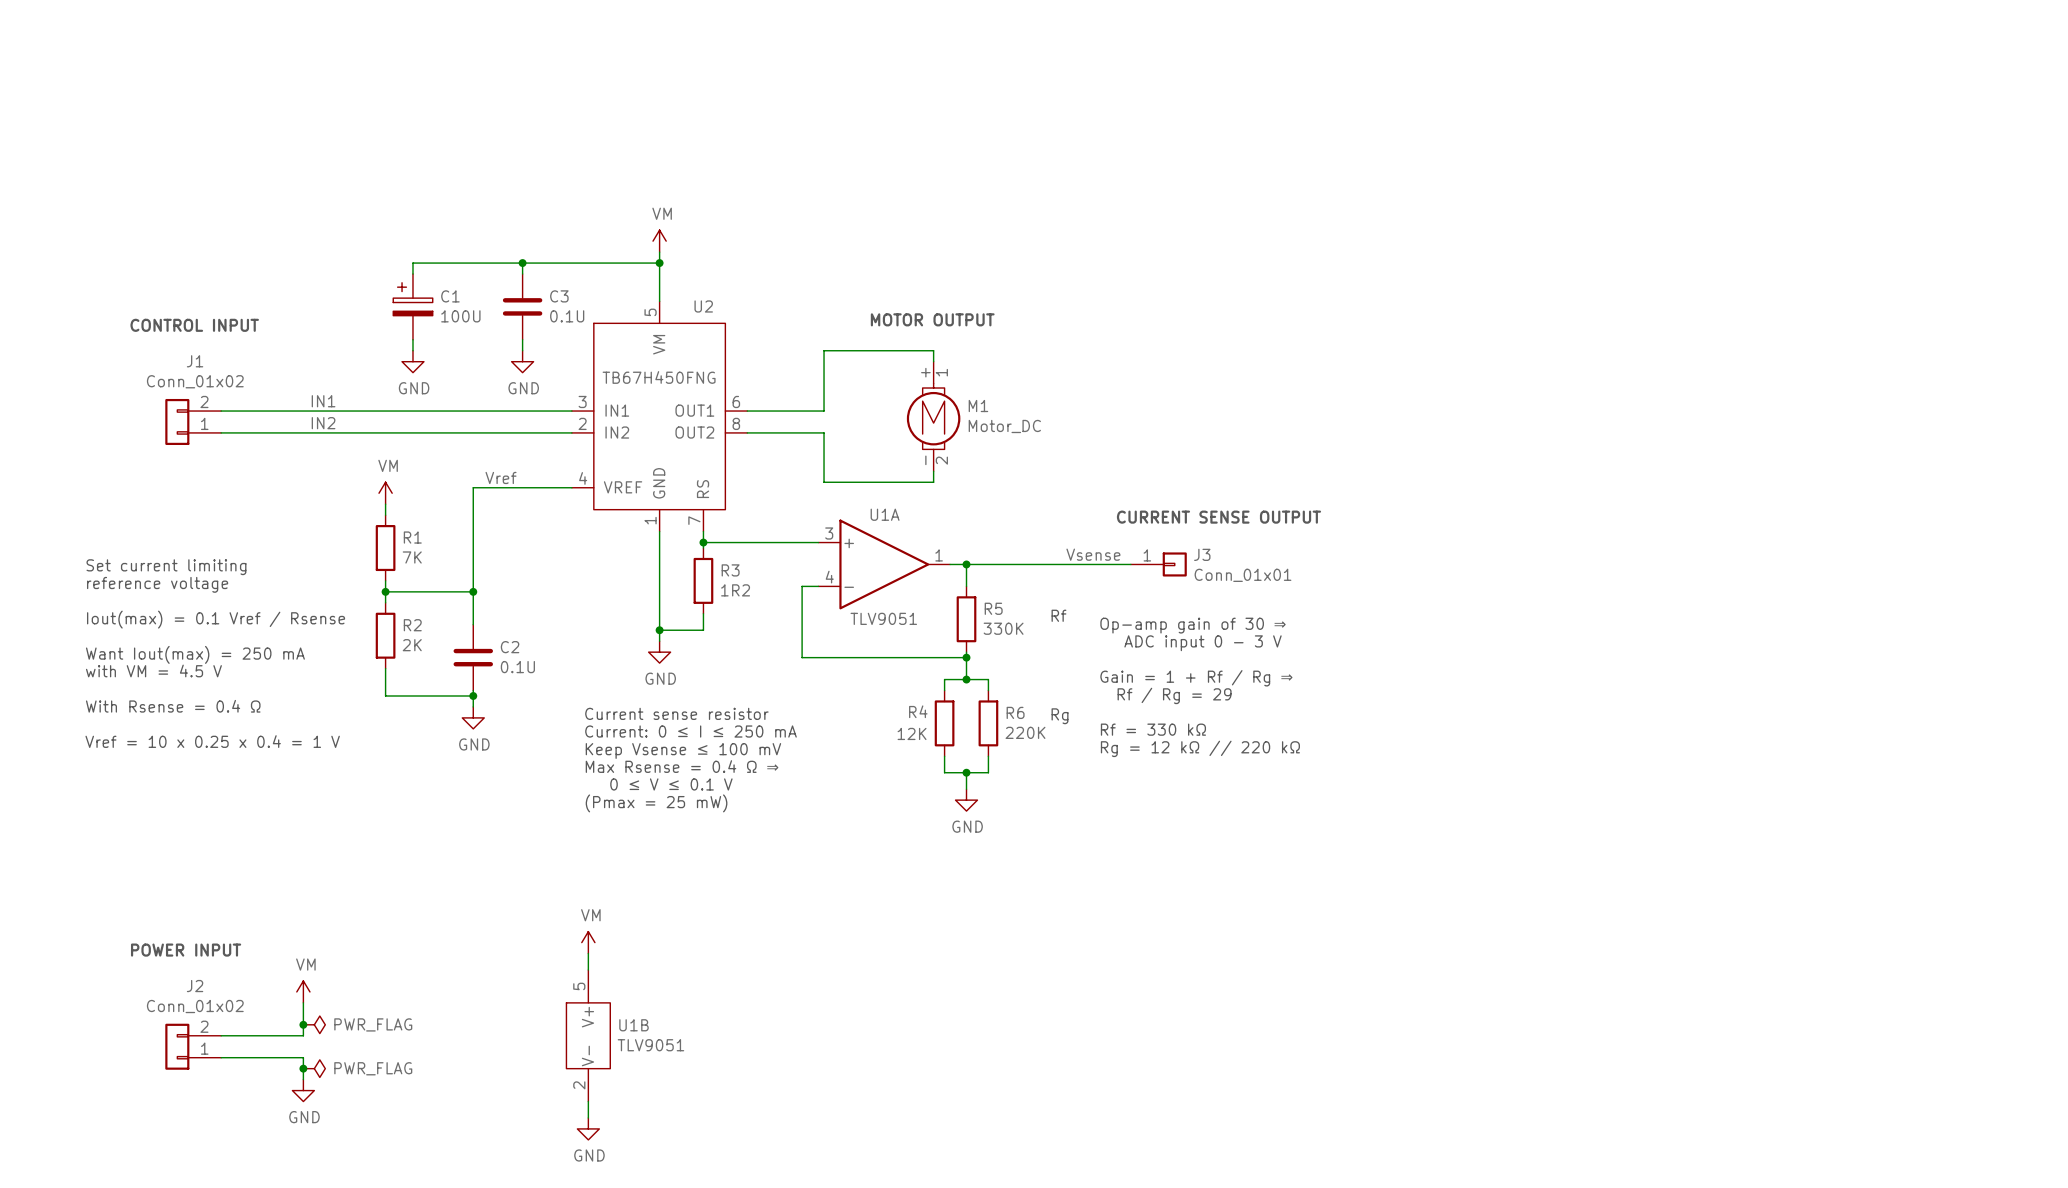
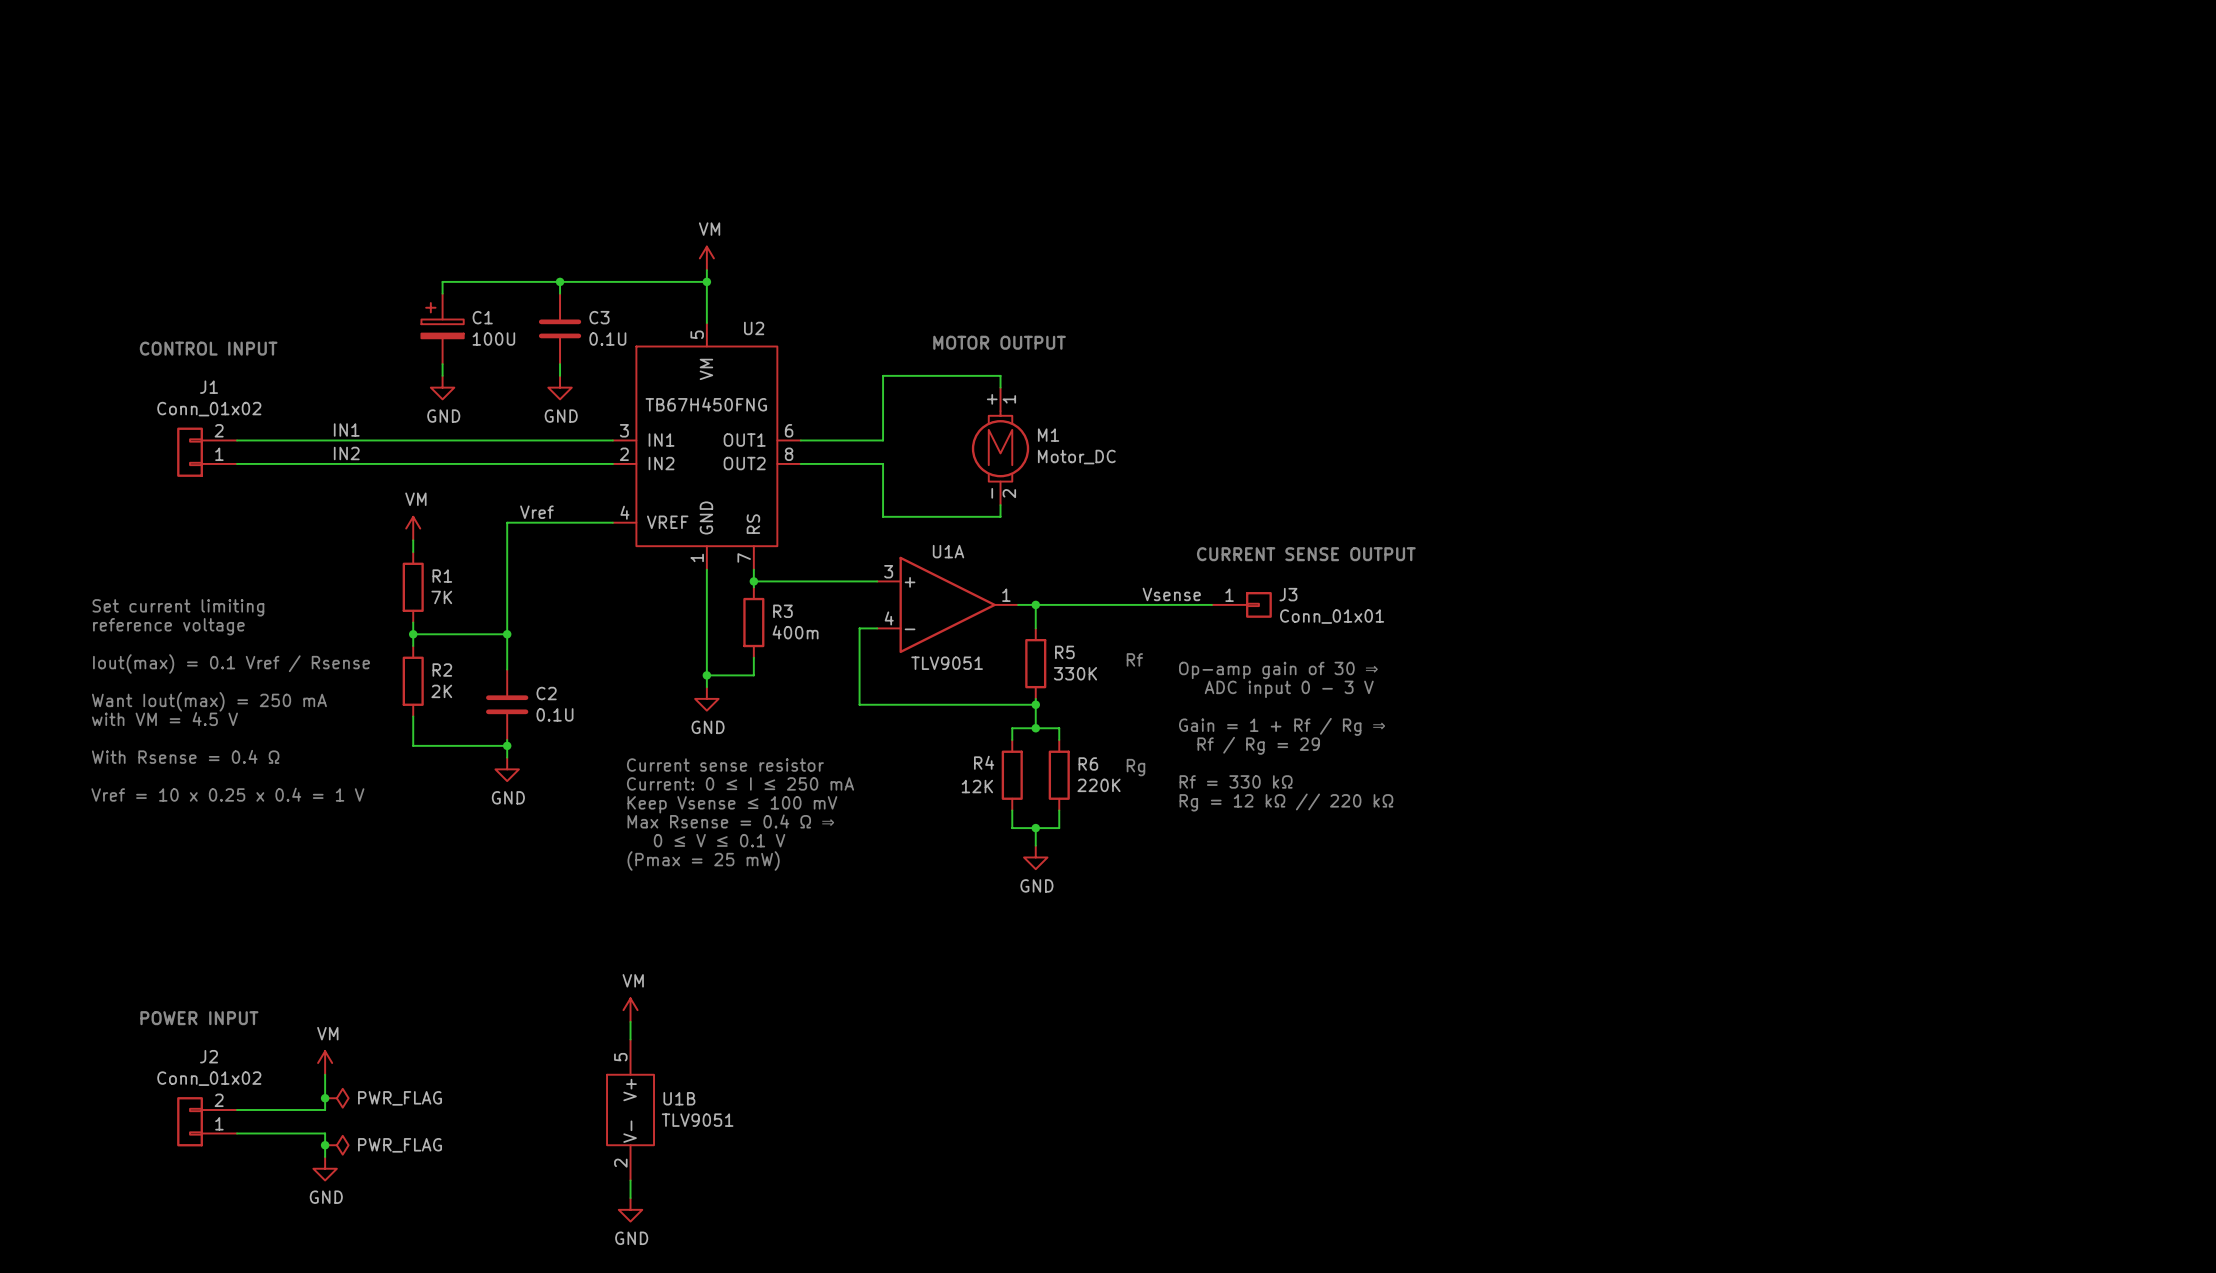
R3 value: 1R2 (735, 590) -> 400m (795, 632)

